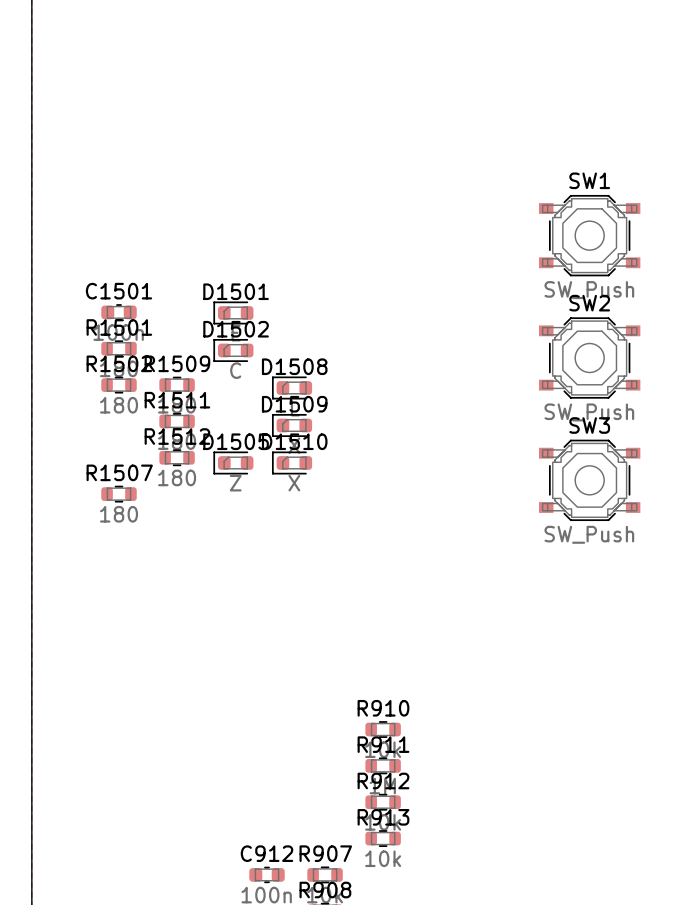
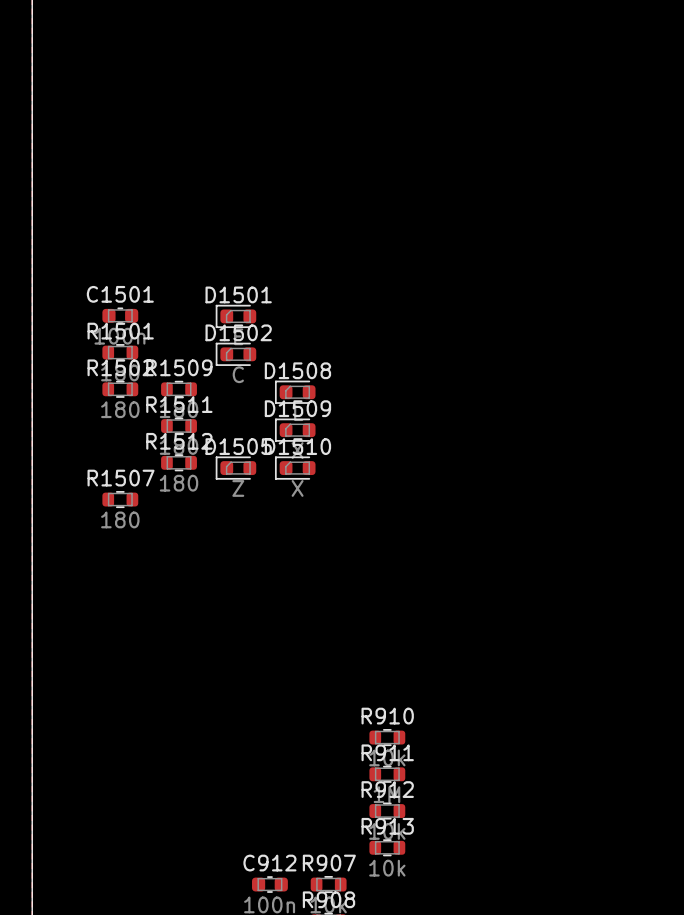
SW1: SW_Push (589, 235) -> none
SW2: SW_Push (589, 357) -> none
SW3: SW_Push (589, 480) -> none

